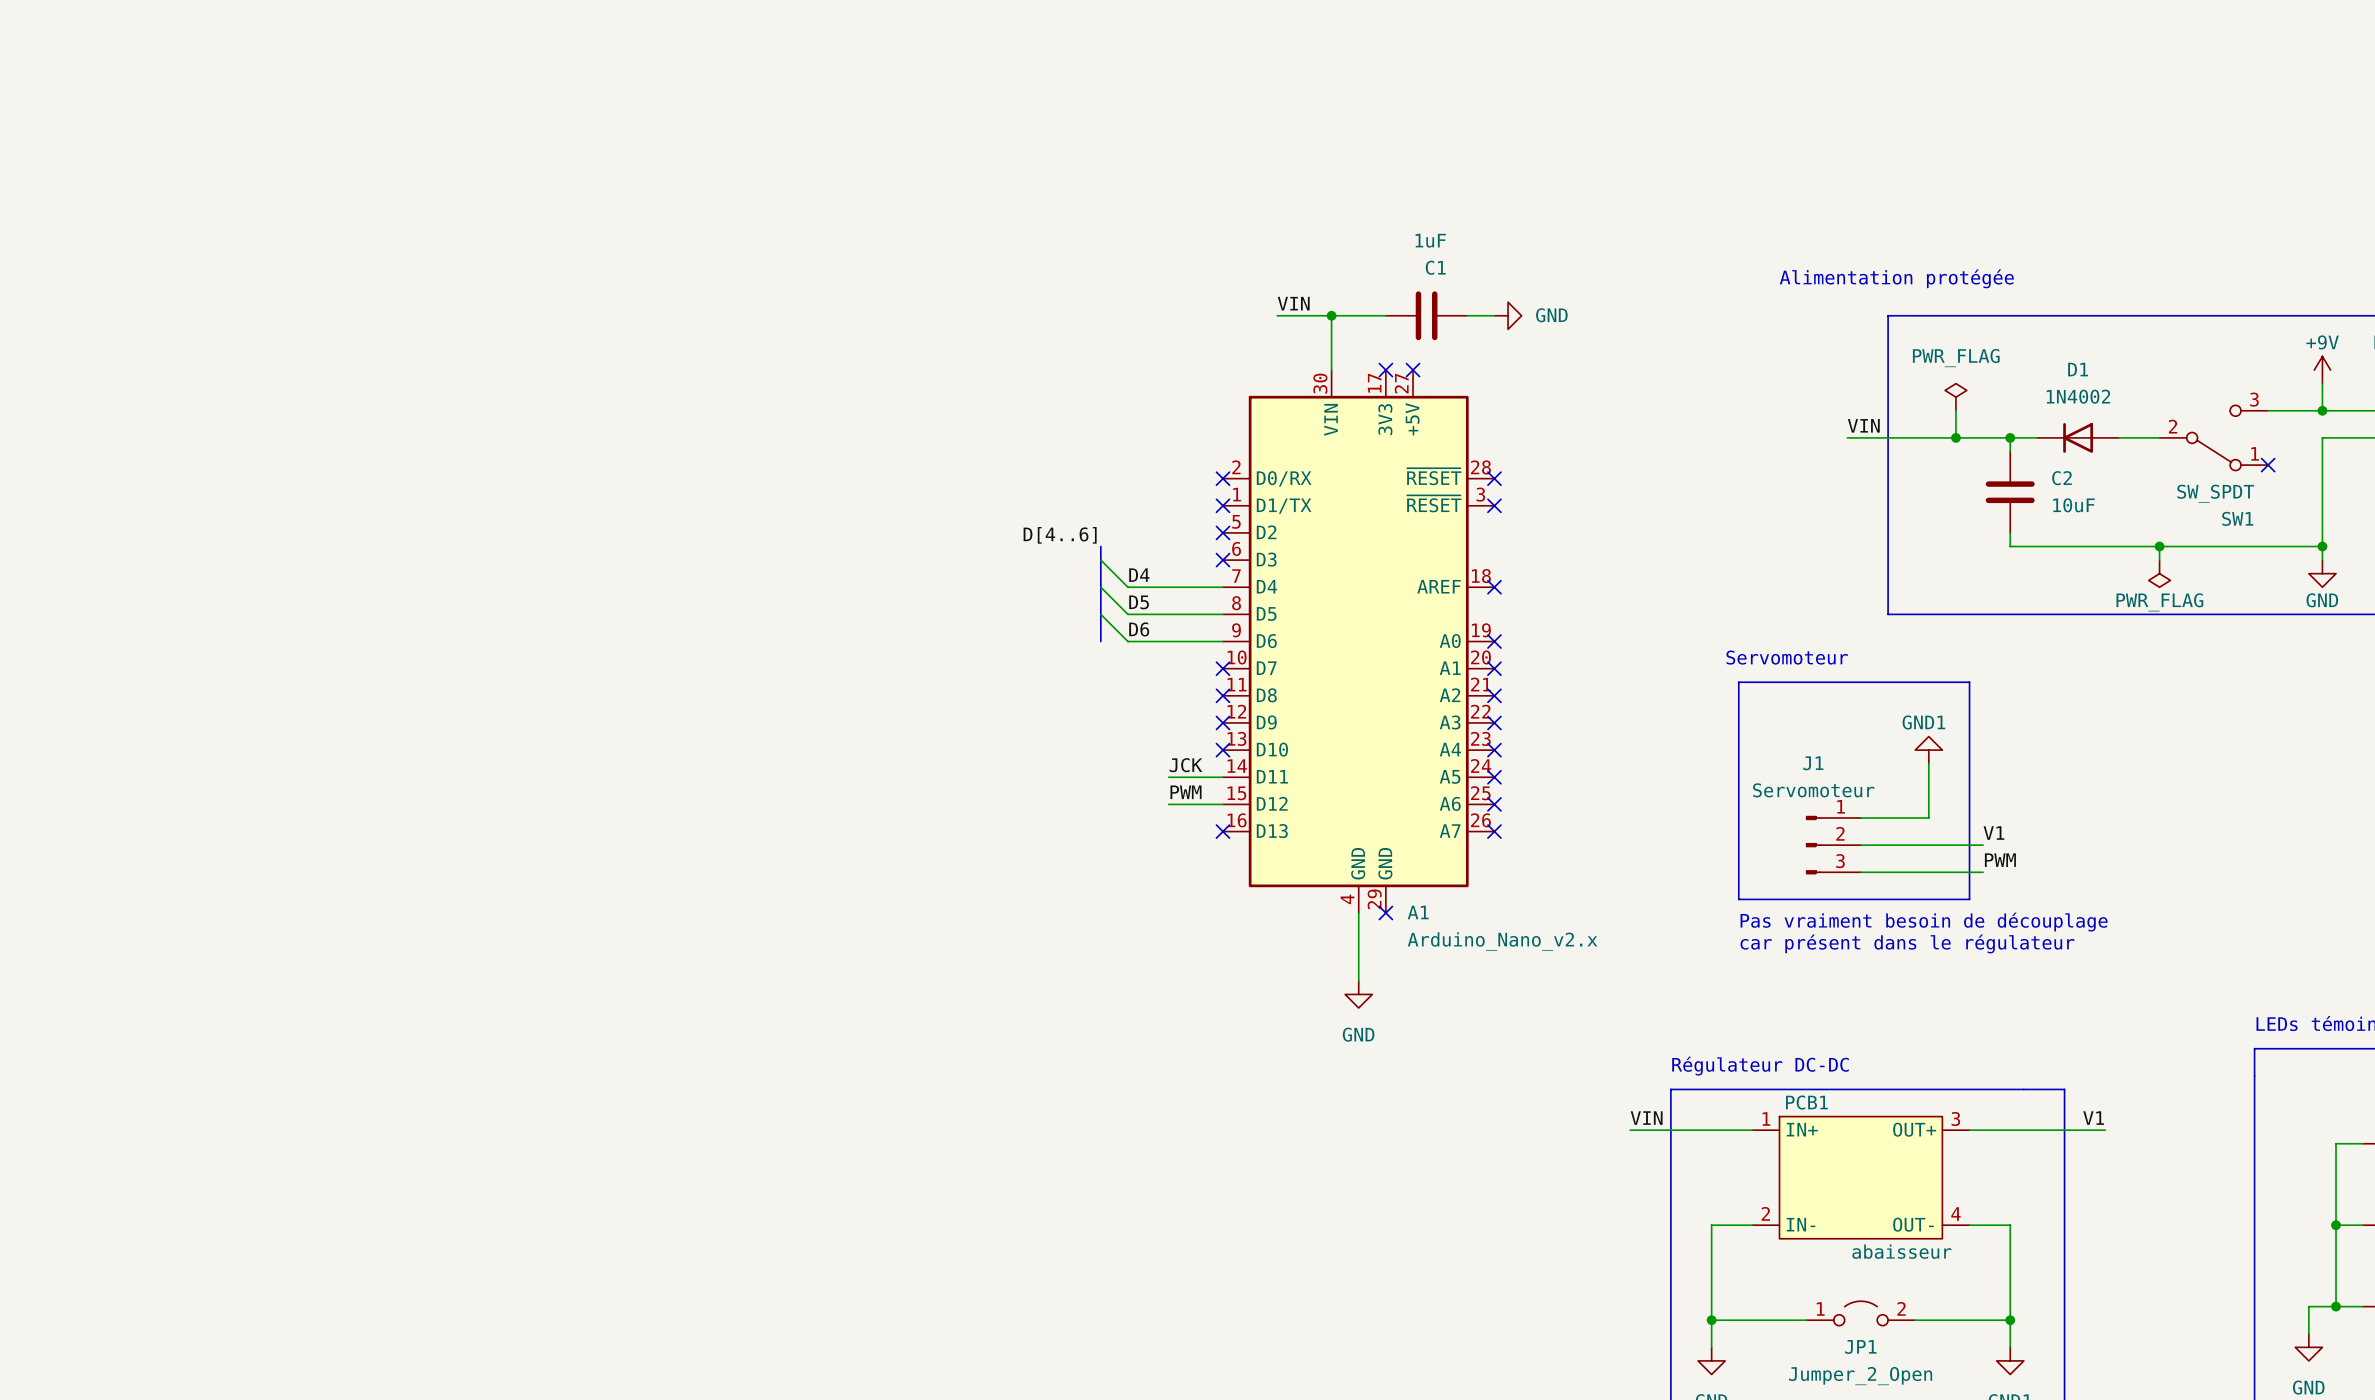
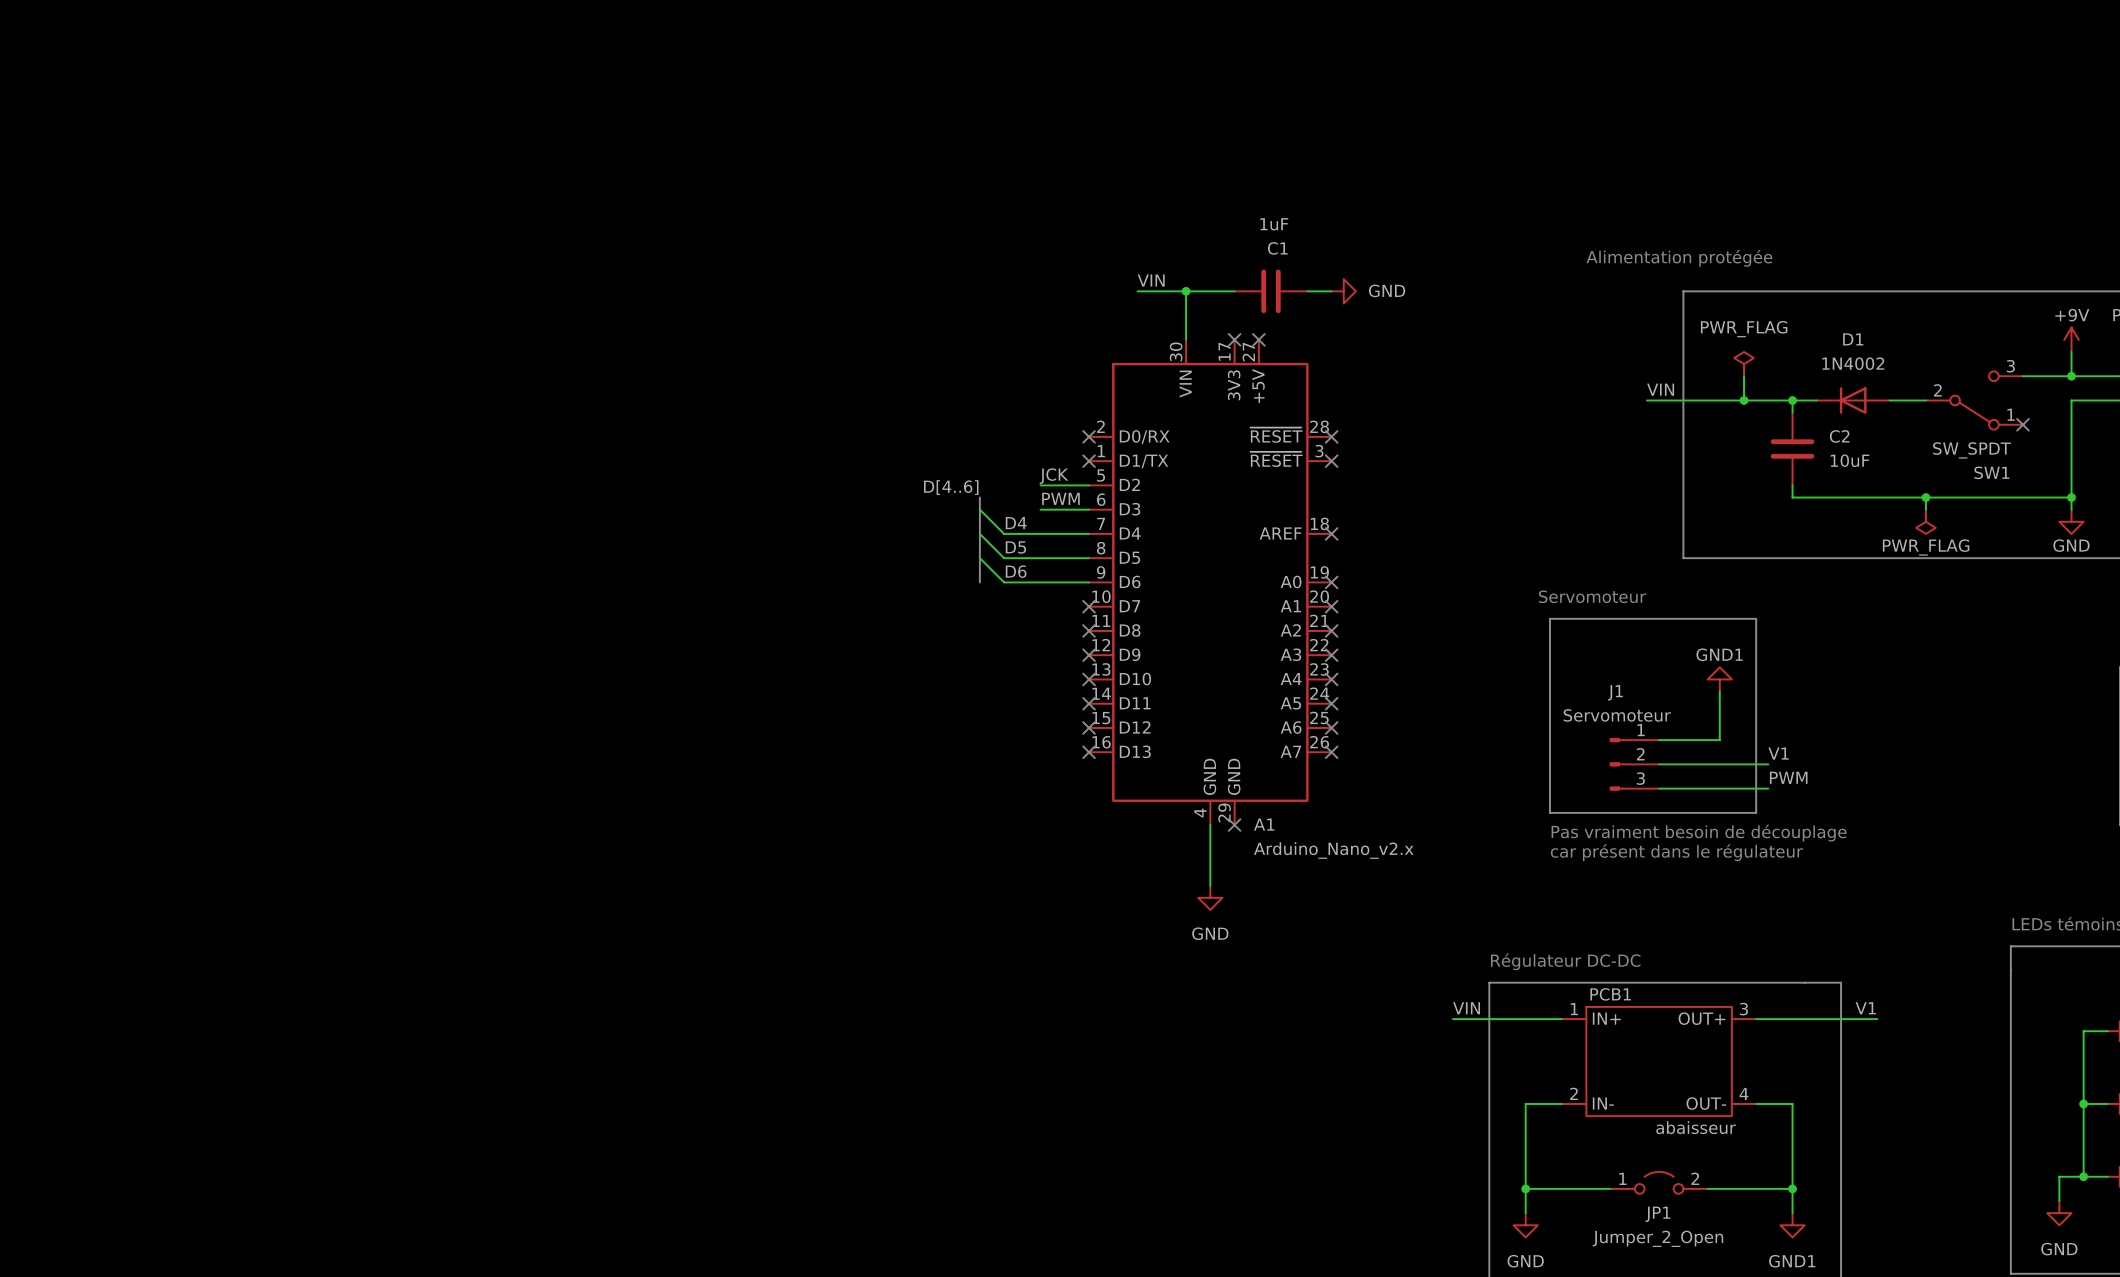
wire: none -> (1040, 485) (1089, 485)
no-connect mark: (1222, 532) -> none
no-connect mark: (1222, 560) -> none
label position: JCK (1185, 765) -> JCK (1054, 476)
wire: (1168, 777) (1222, 777) -> (1040, 509) (1089, 509)
no-connect mark: none -> (1089, 703)
label position: PWM (1186, 792) -> PWM (1060, 498)
wire: (1168, 804) (1222, 804) -> none
no-connect mark: none -> (1089, 727)

